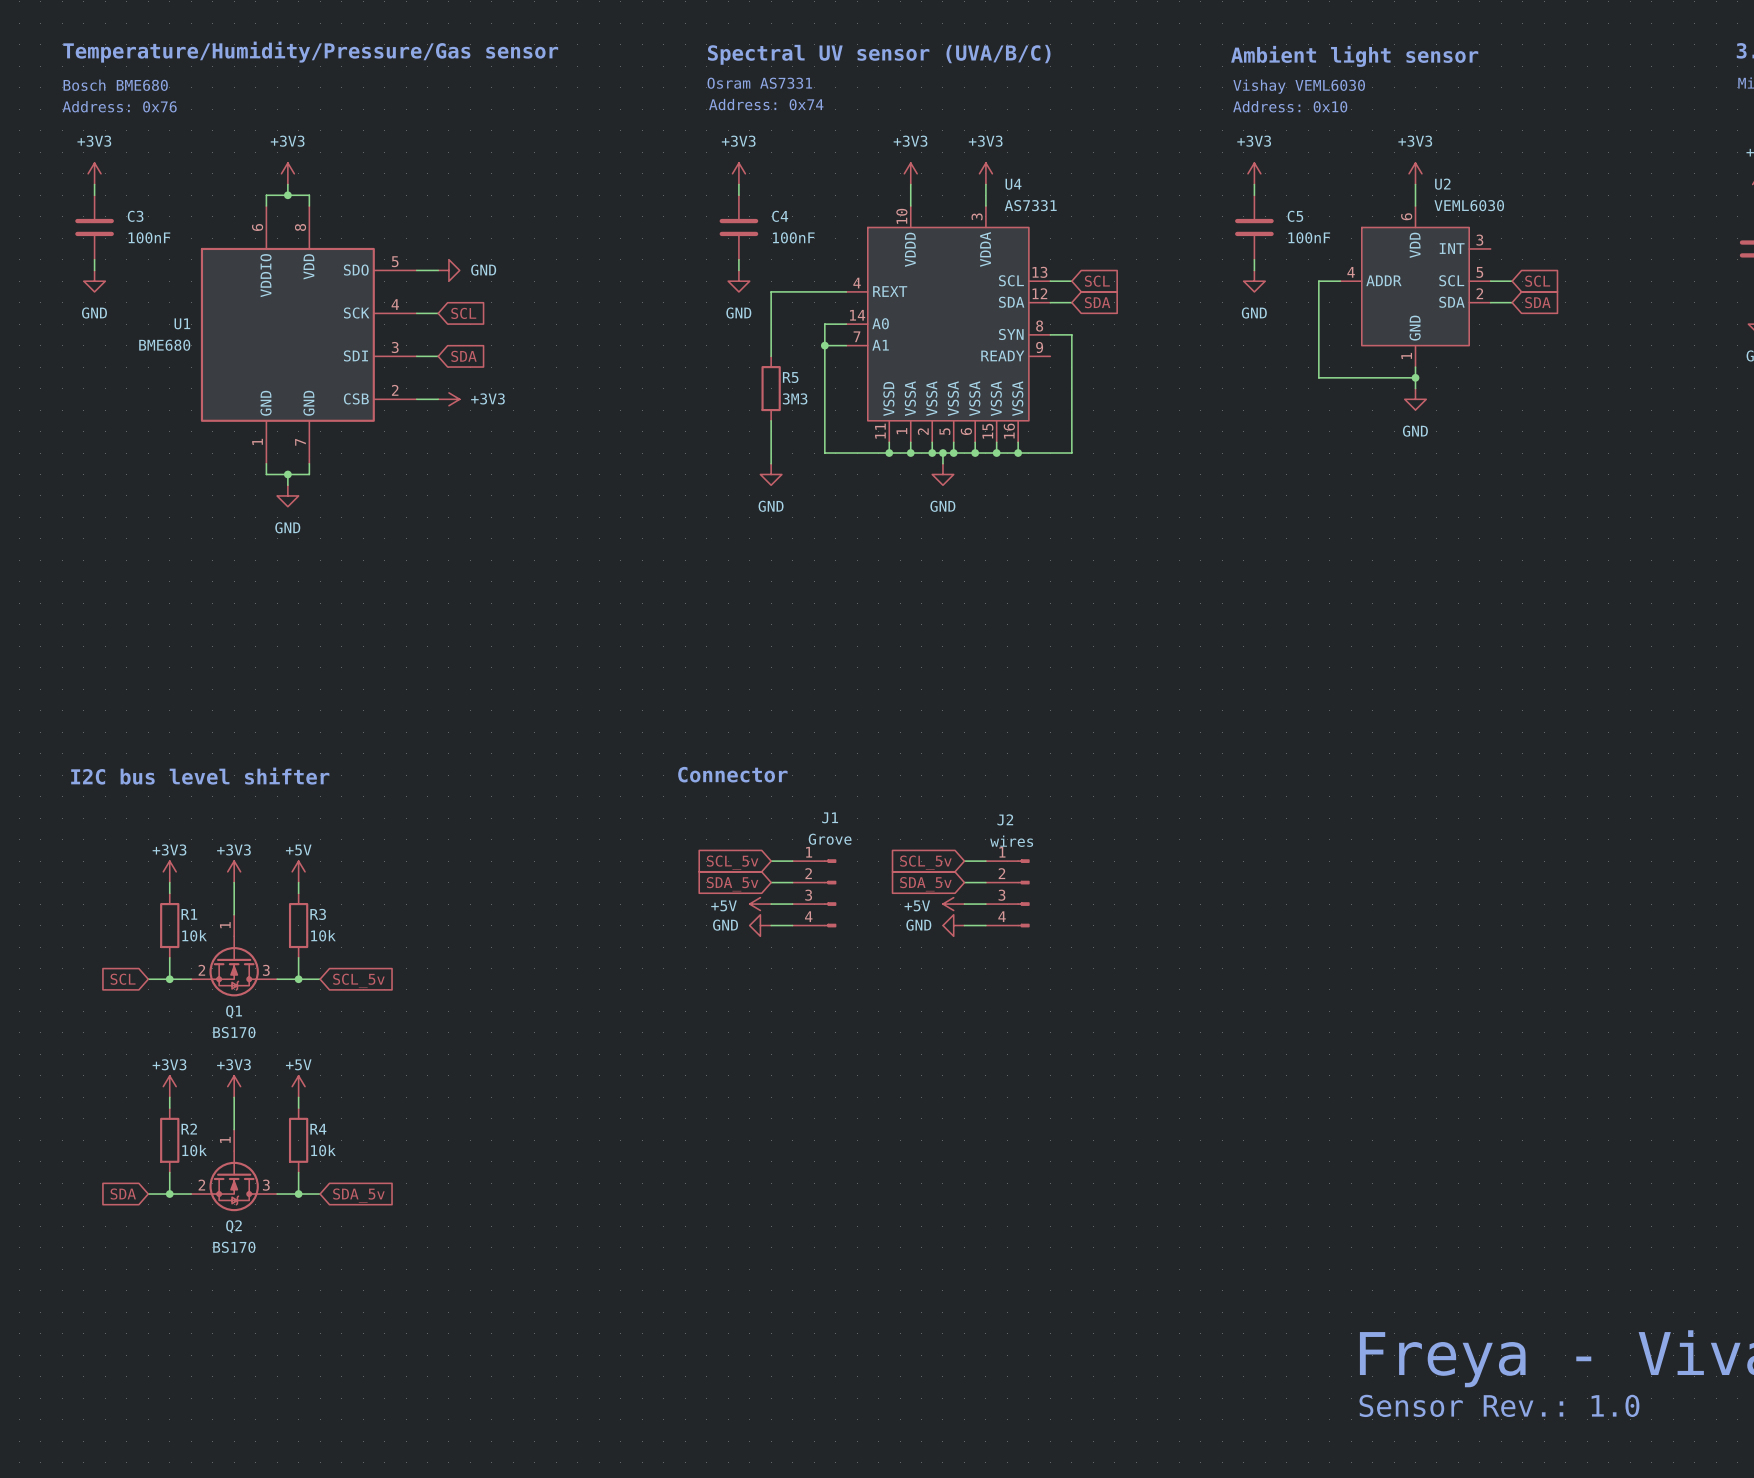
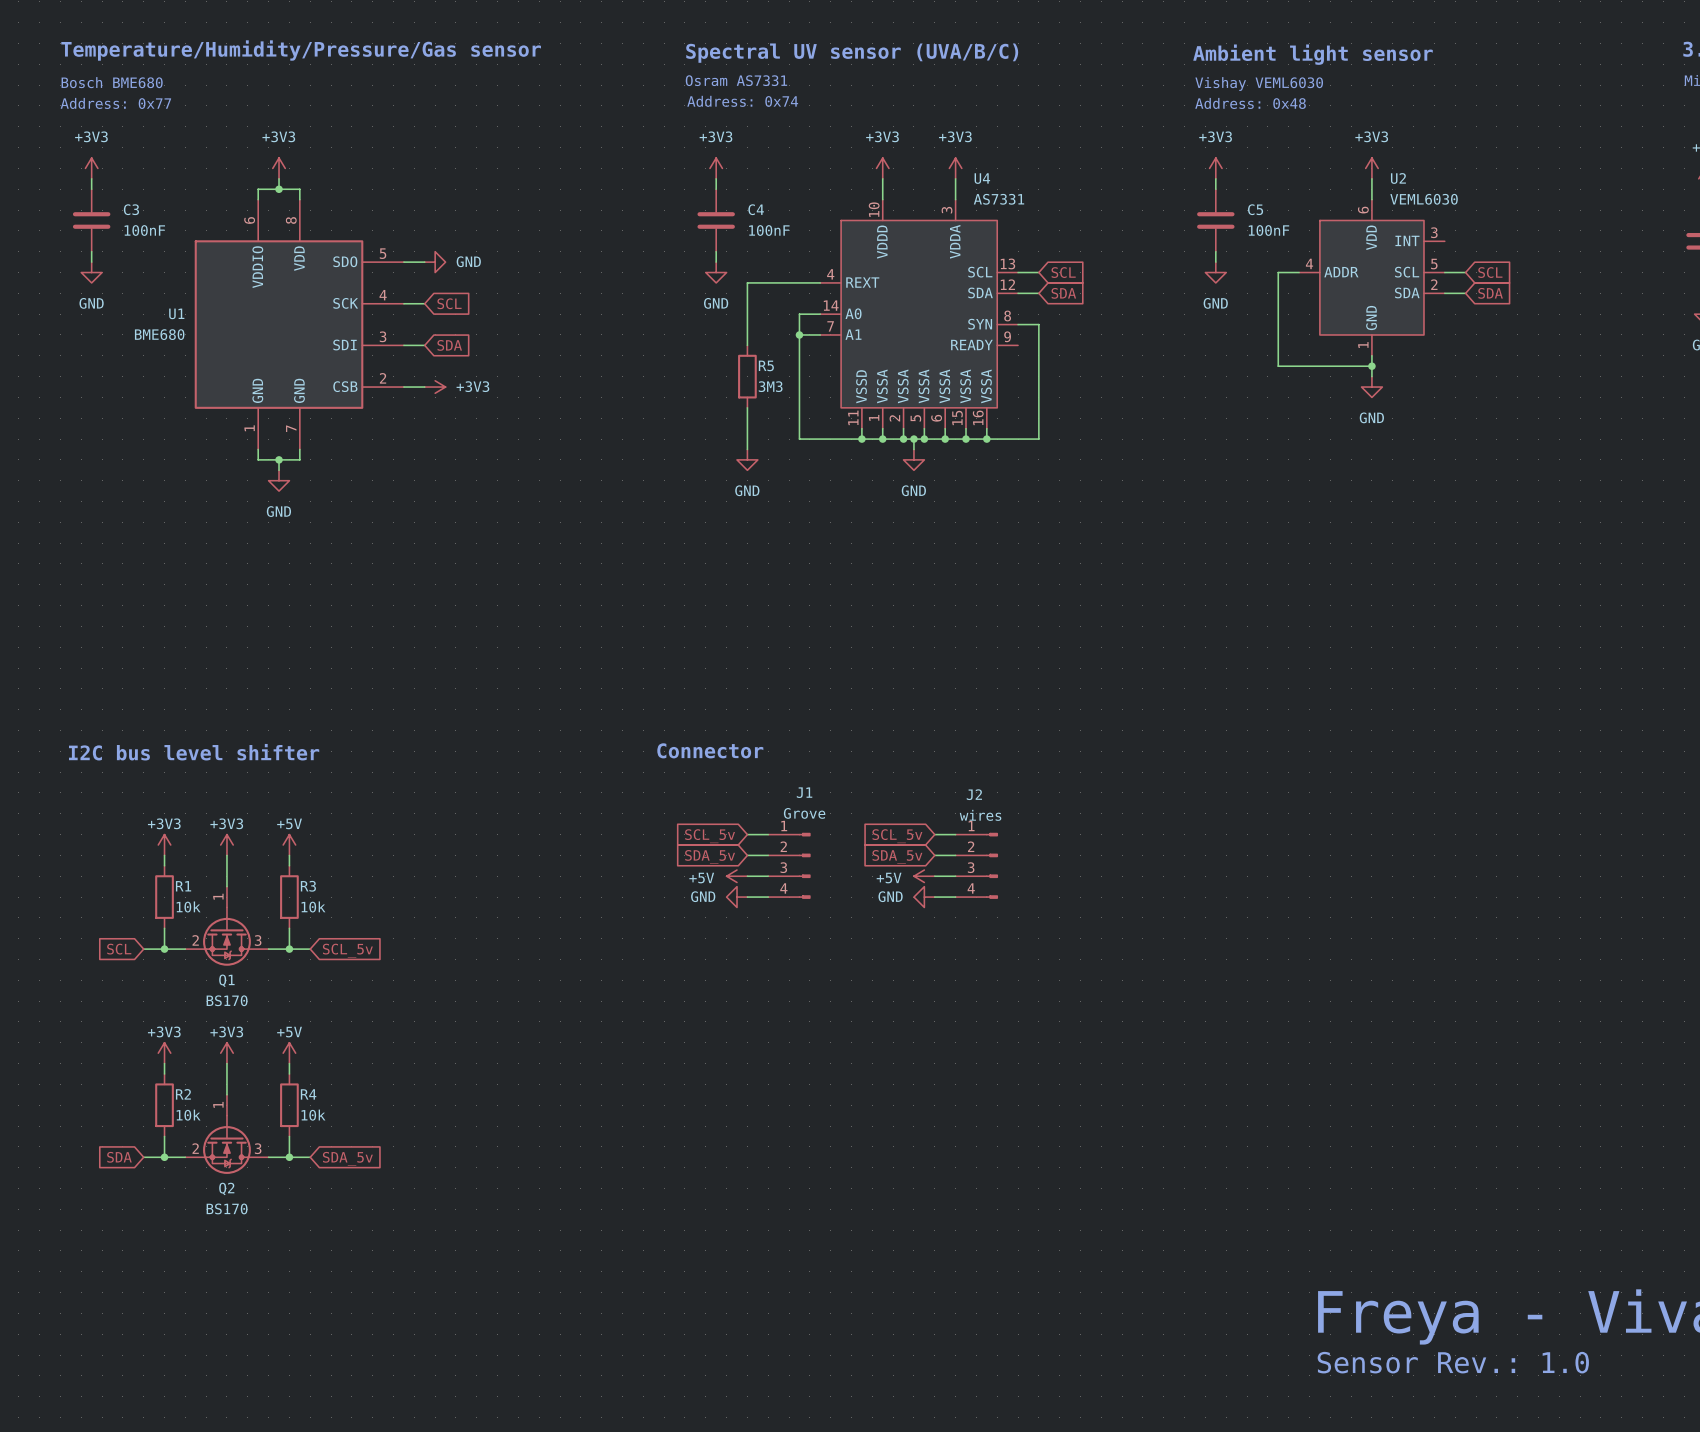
text: Address: 0x76 (119, 106) -> Address: 0x77 (115, 103)
text: Address: 0x10 (1290, 106) -> Address: 0x48 (1250, 103)

